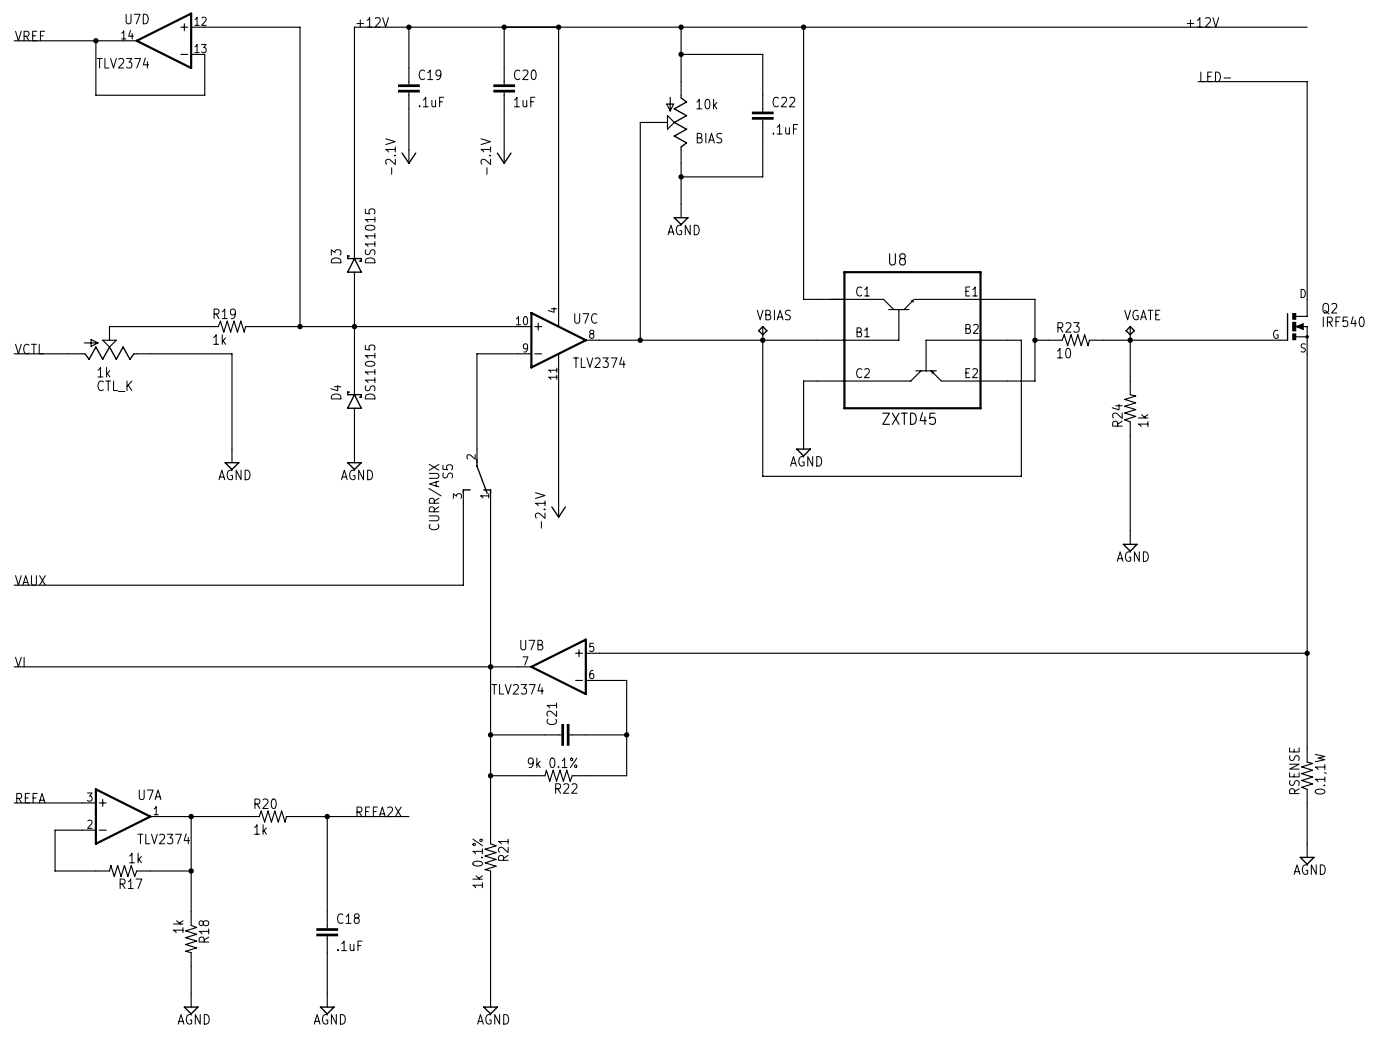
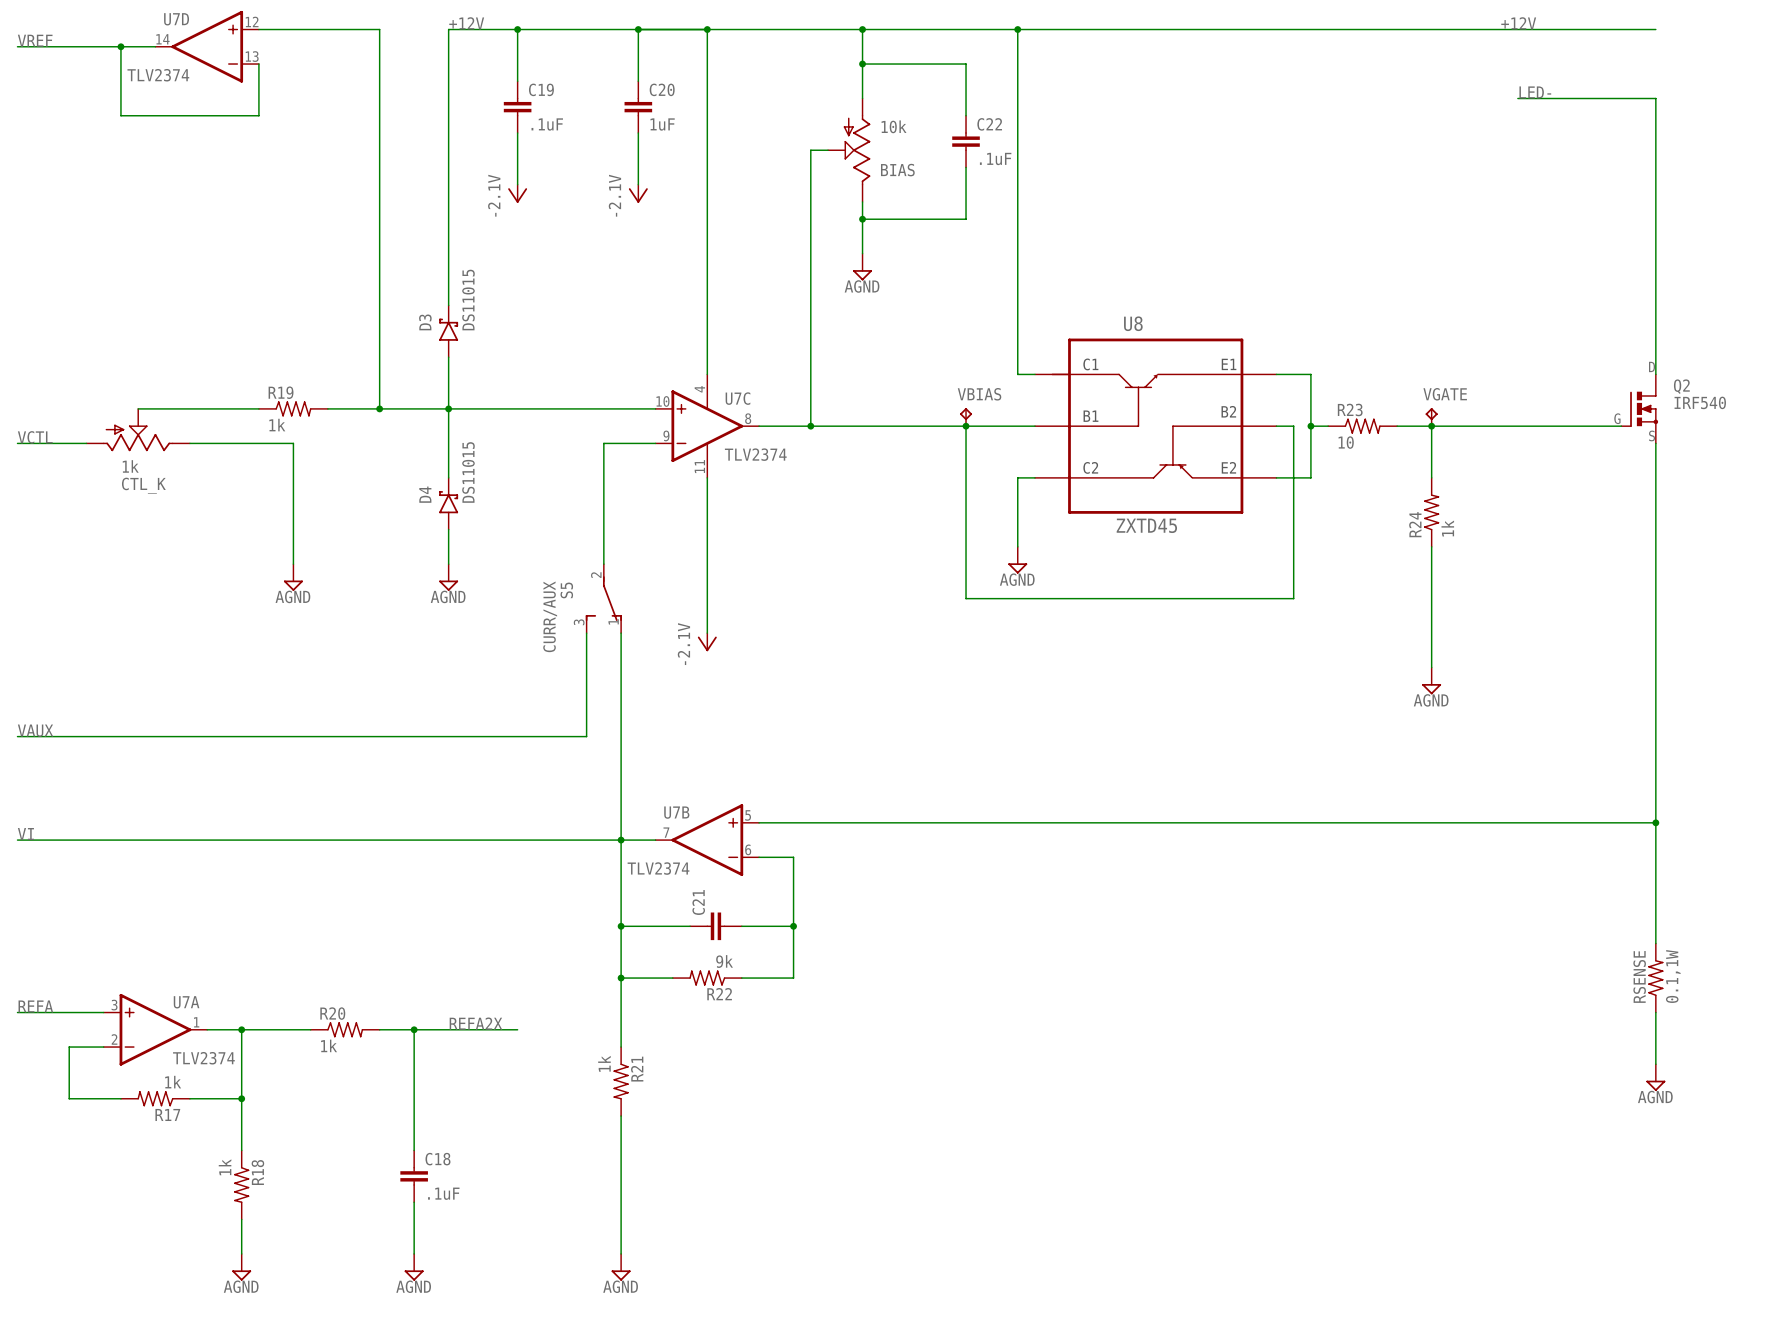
R22 value: 9k 0.1% (552, 762) -> 9k (724, 961)
R21 value: 1k 0.1% (477, 863) -> 1k (604, 1063)

